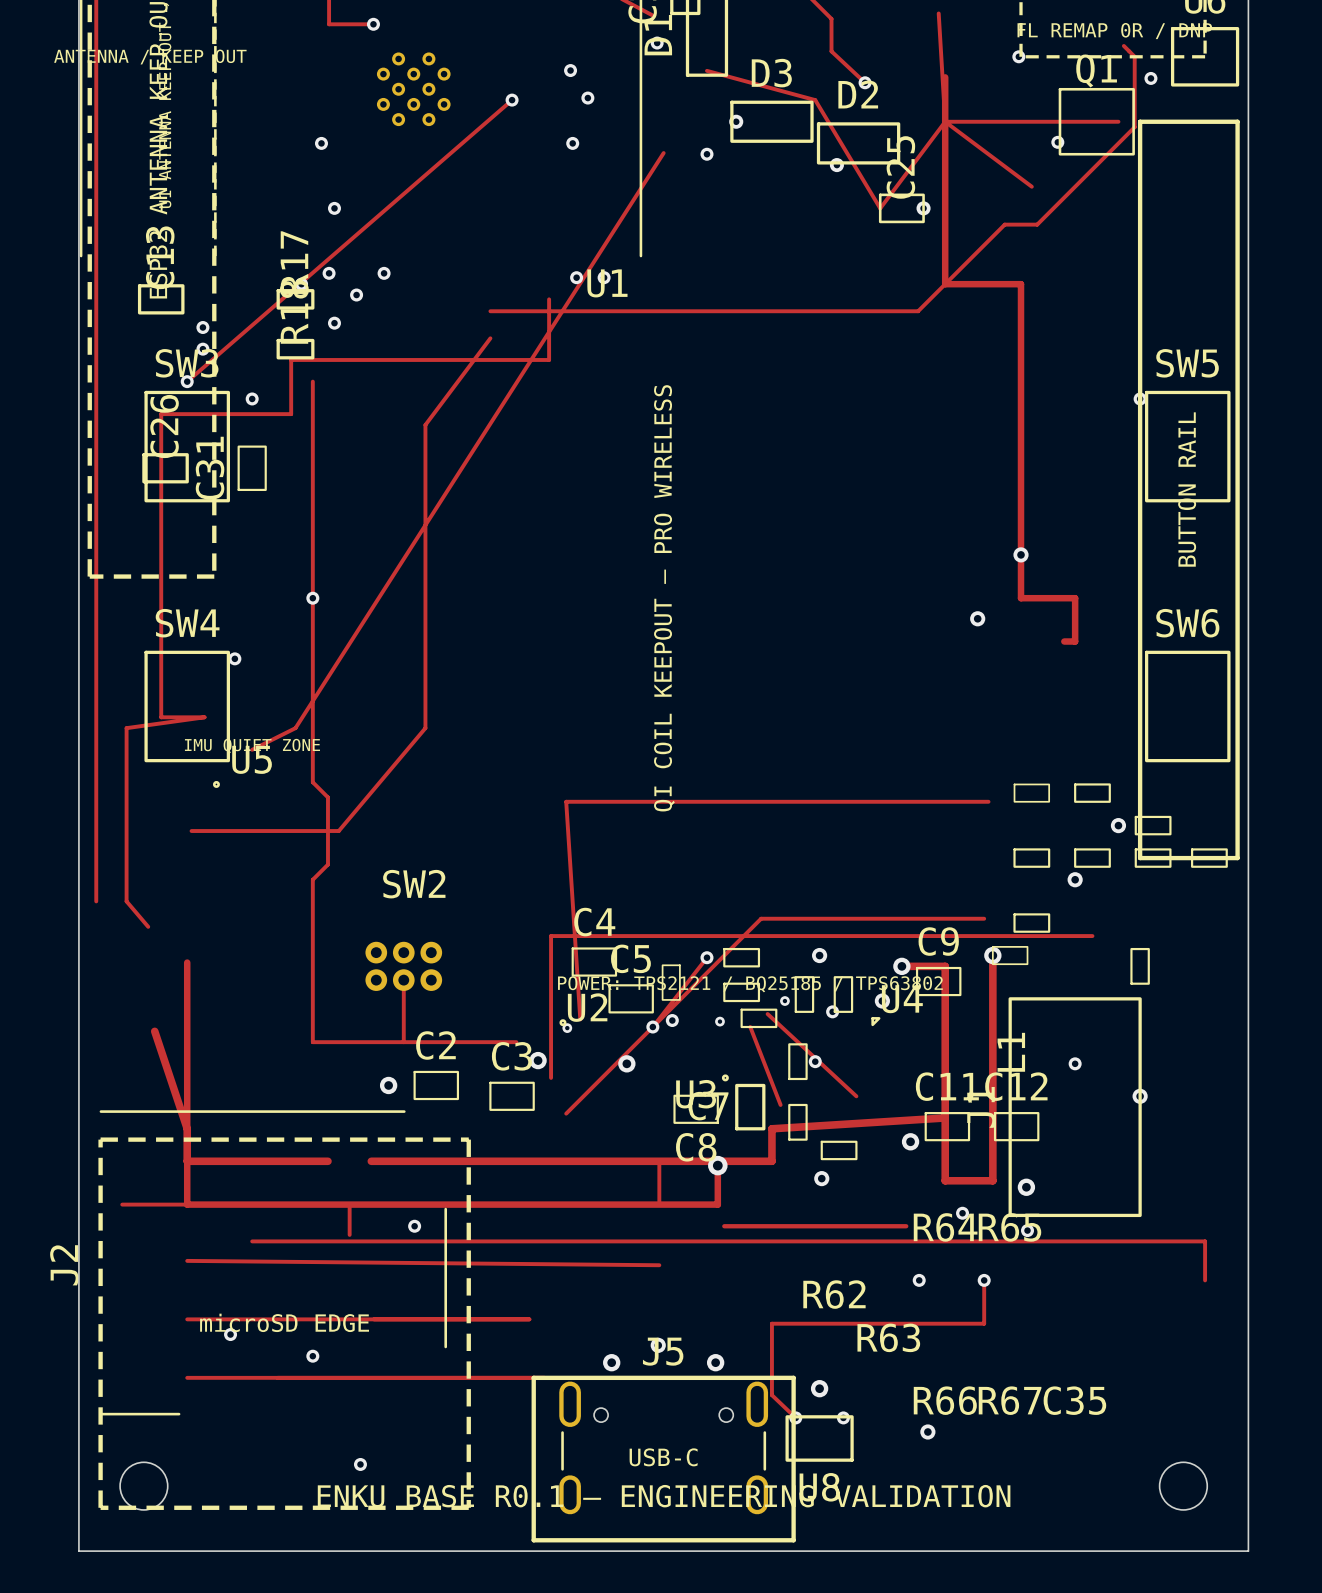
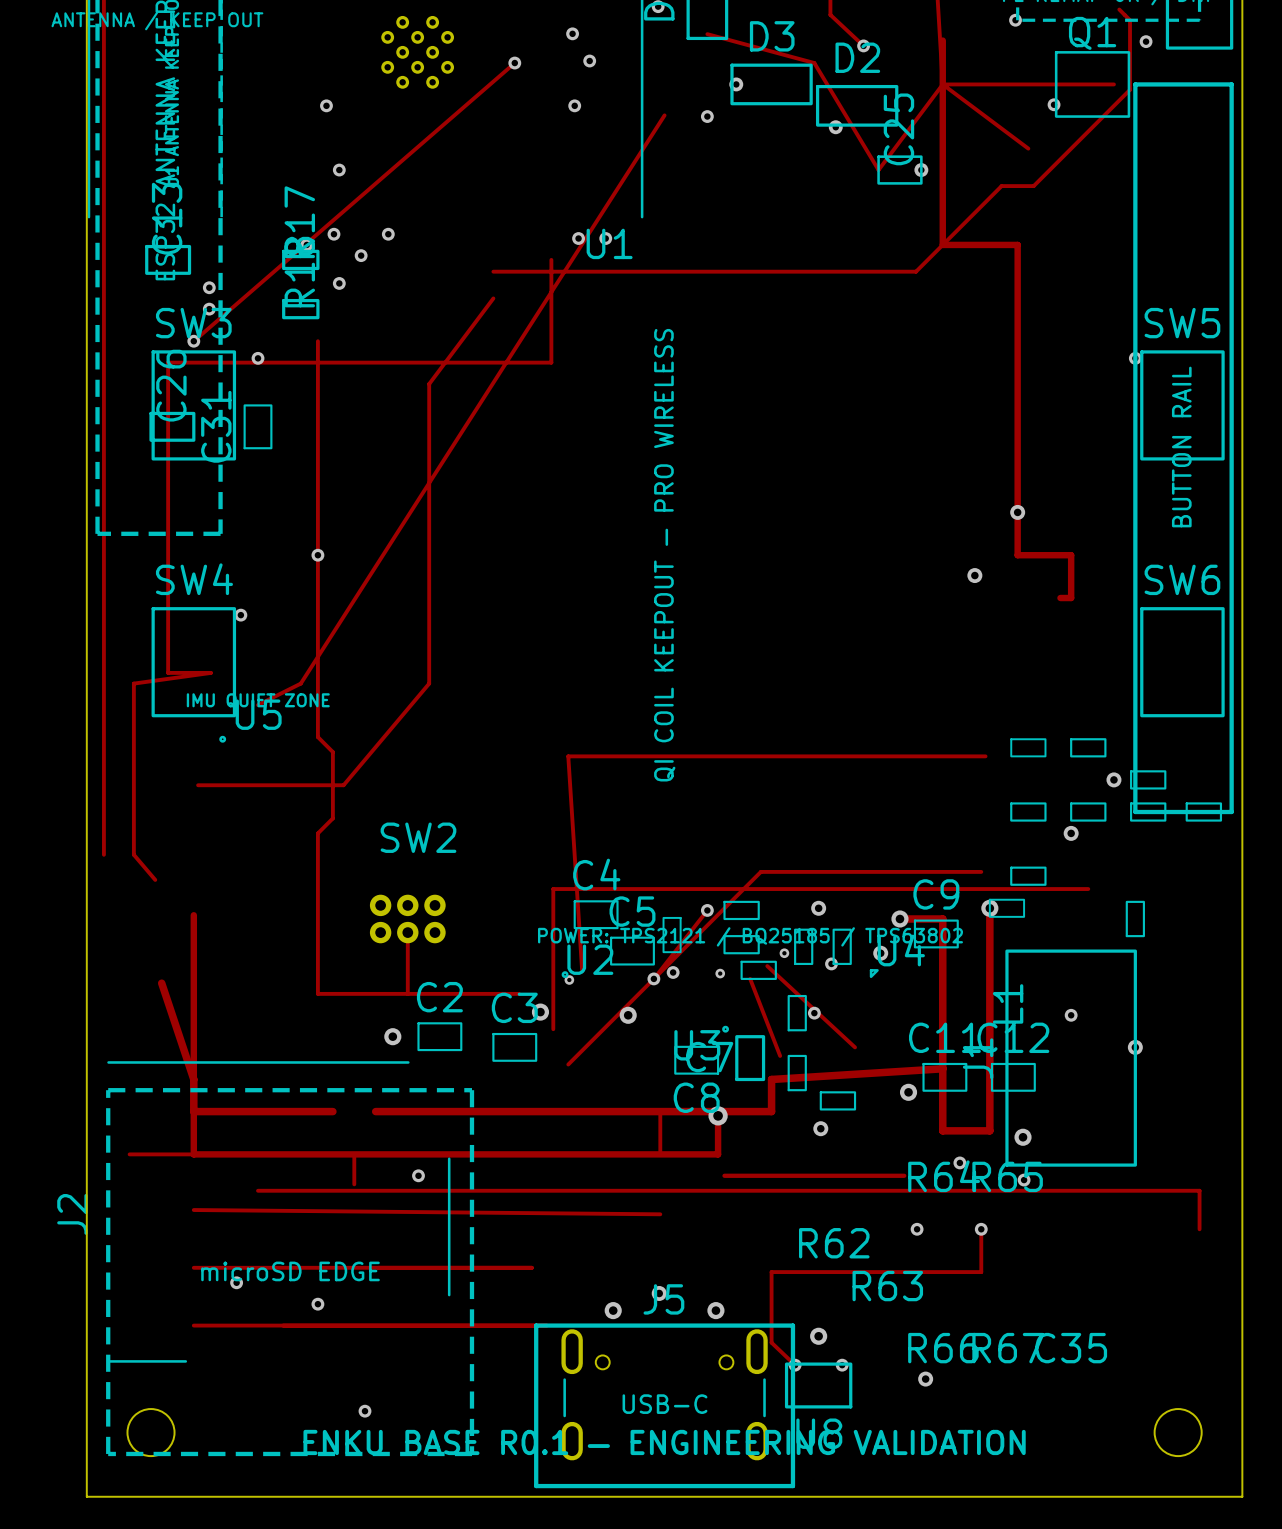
track: (549, 359) (291, 359) (291, 414) (161, 414) -> (551, 319) (551, 362) (168, 362) (168, 373)

